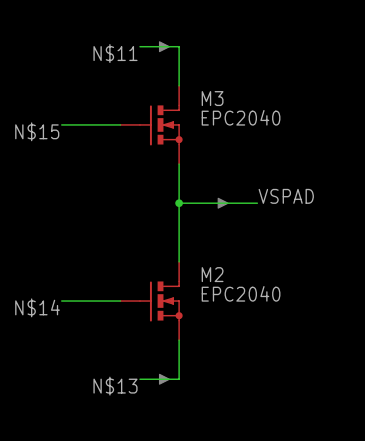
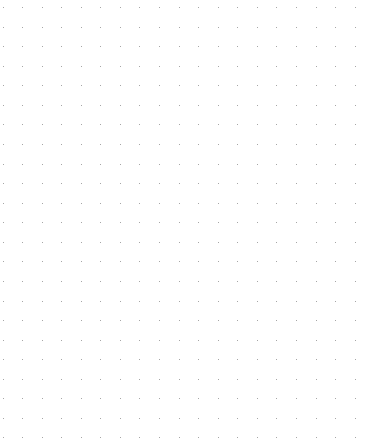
wire: (139, 46) (179, 46) (179, 85) -> none
part: (164, 46) -> none
label: N$11 (115, 53) -> none
wire: (61, 124) (120, 124) -> none
M3: EPC2040 (151, 124) -> none
label: N$15 (37, 131) -> none
wire: (179, 164) (179, 261) -> none
label: VSPAD (286, 196) -> none
wire: (179, 203) (257, 203) -> none
junction: (179, 203) -> none
part: (223, 203) -> none
wire: (61, 301) (120, 301) -> none
M2: EPC2040 (151, 301) -> none
label: N$14 (37, 307) -> none
wire: (179, 340) (179, 379) (139, 379) -> none
part: (164, 379) -> none
label: N$13 (115, 386) -> none

